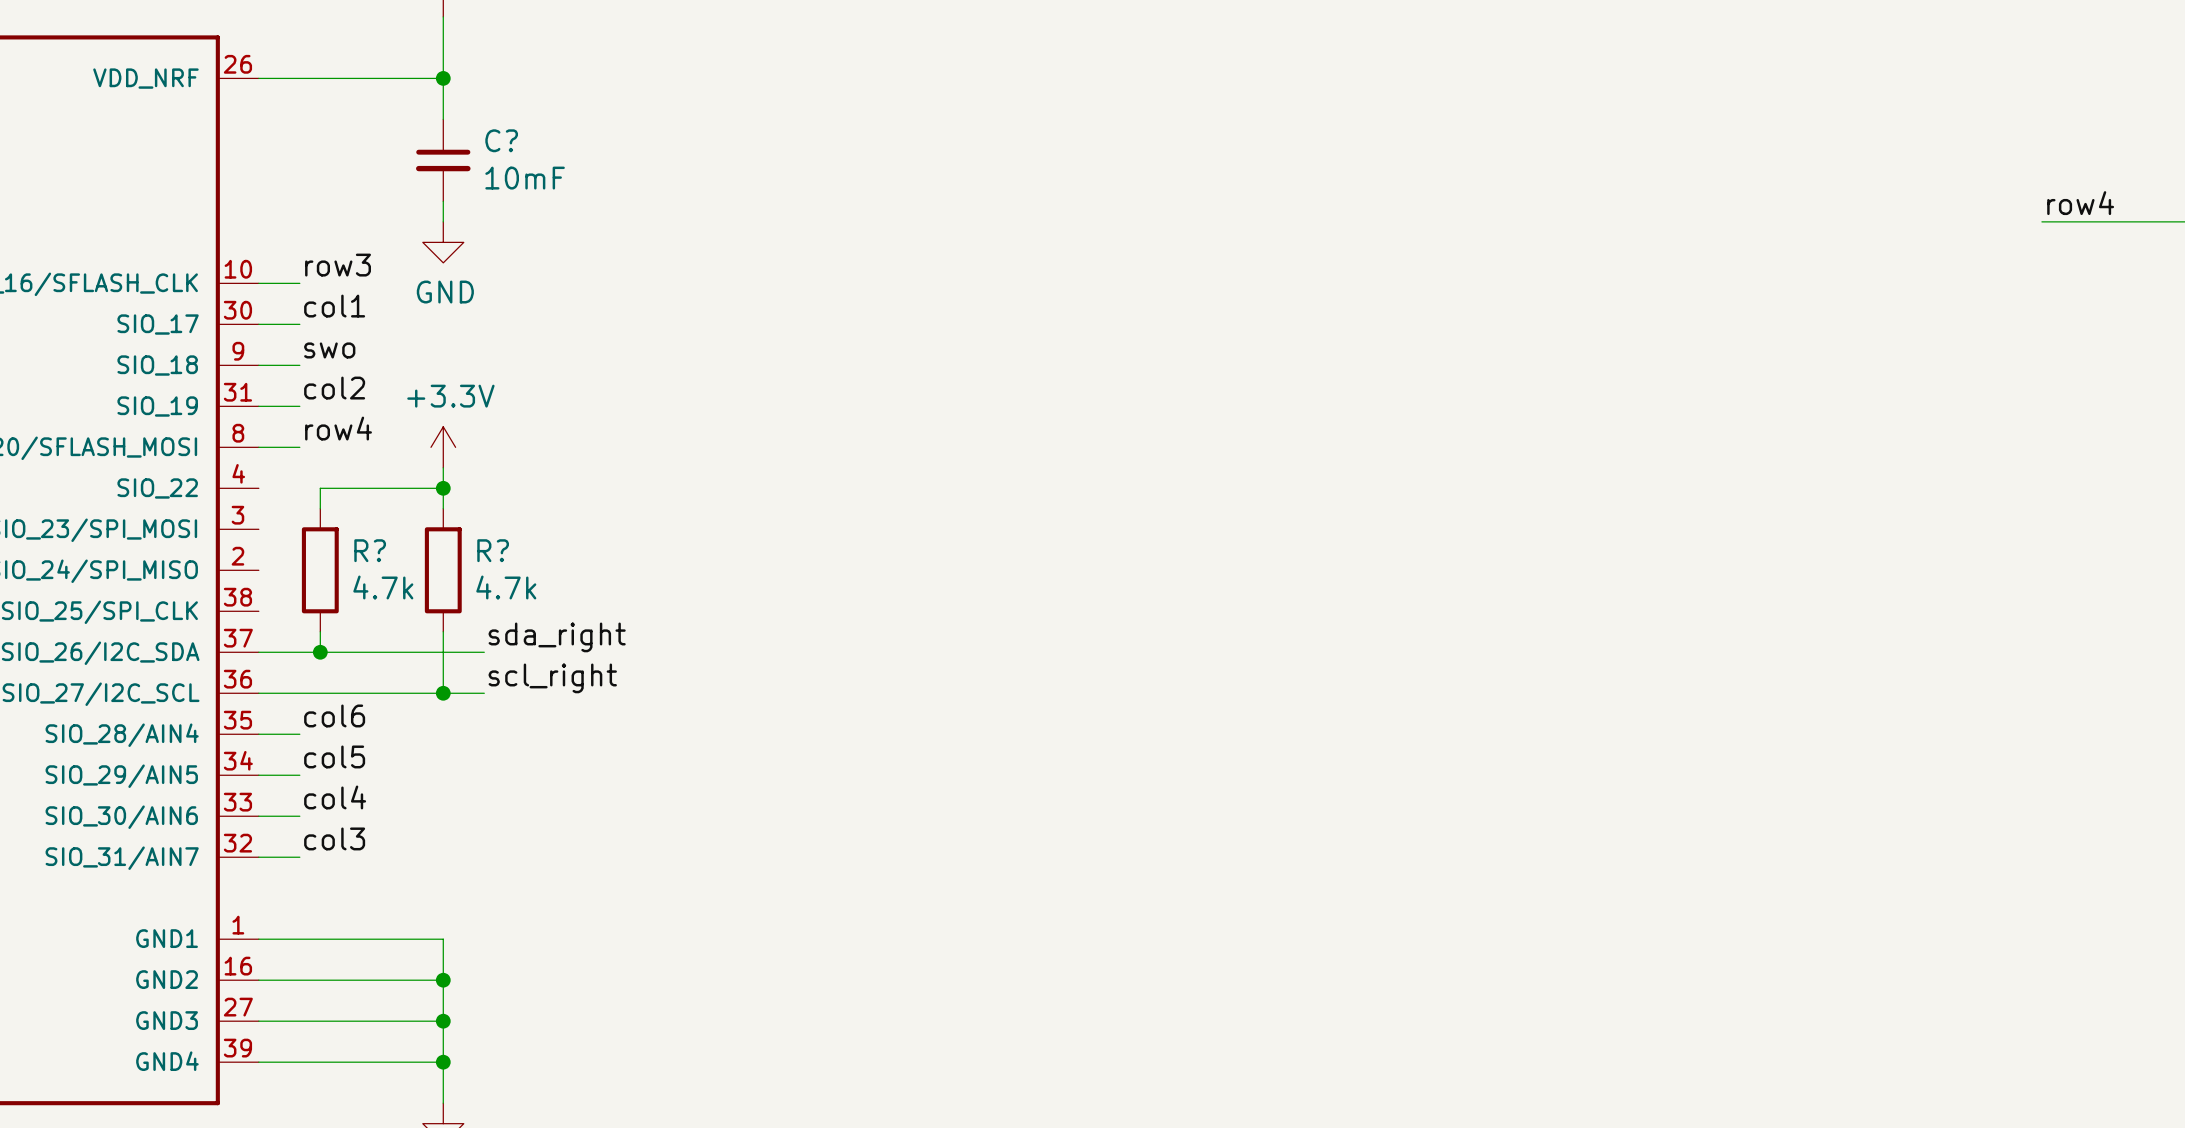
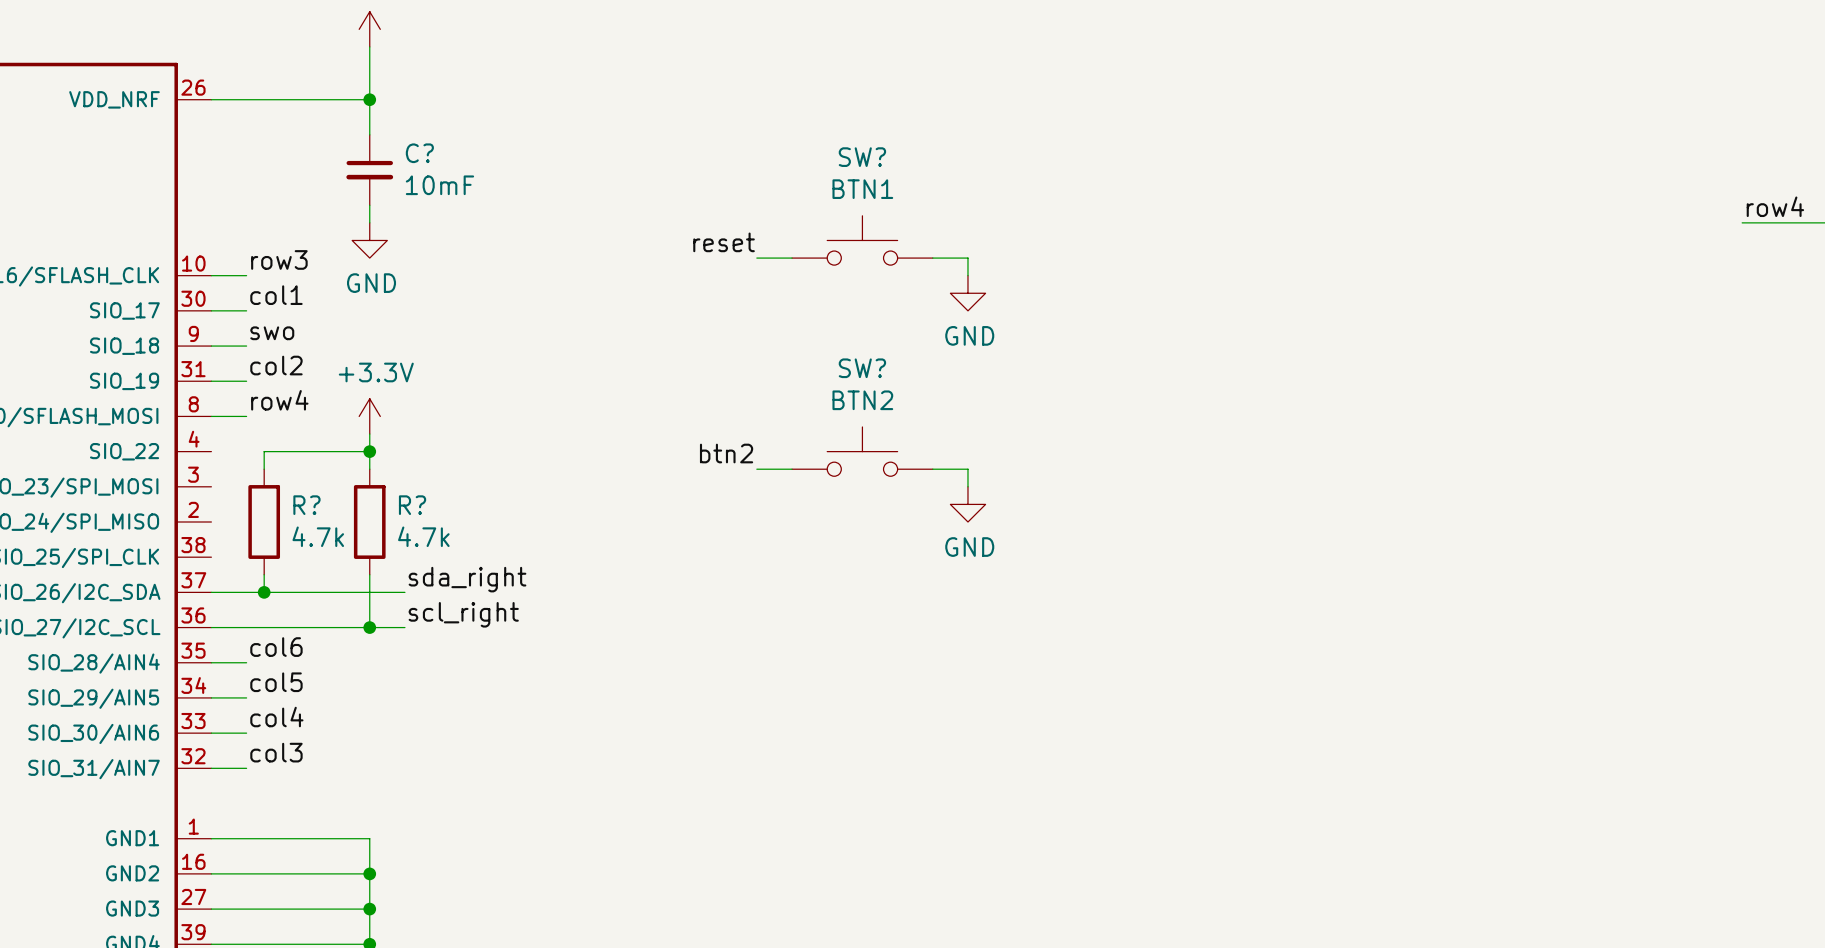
SW?: none -> BTN1 (862, 240)
label: none -> reset (724, 242)
wire: none -> (756, 258) (792, 258)
wire: none -> (932, 258) (967, 258) (967, 275)
power symbol: none -> GND (967, 293)
SW?: none -> BTN2 (862, 451)
label: none -> btn2 (726, 453)
wire: none -> (756, 469) (792, 469)
wire: none -> (932, 469) (967, 469) (967, 486)
power symbol: none -> GND (967, 504)

